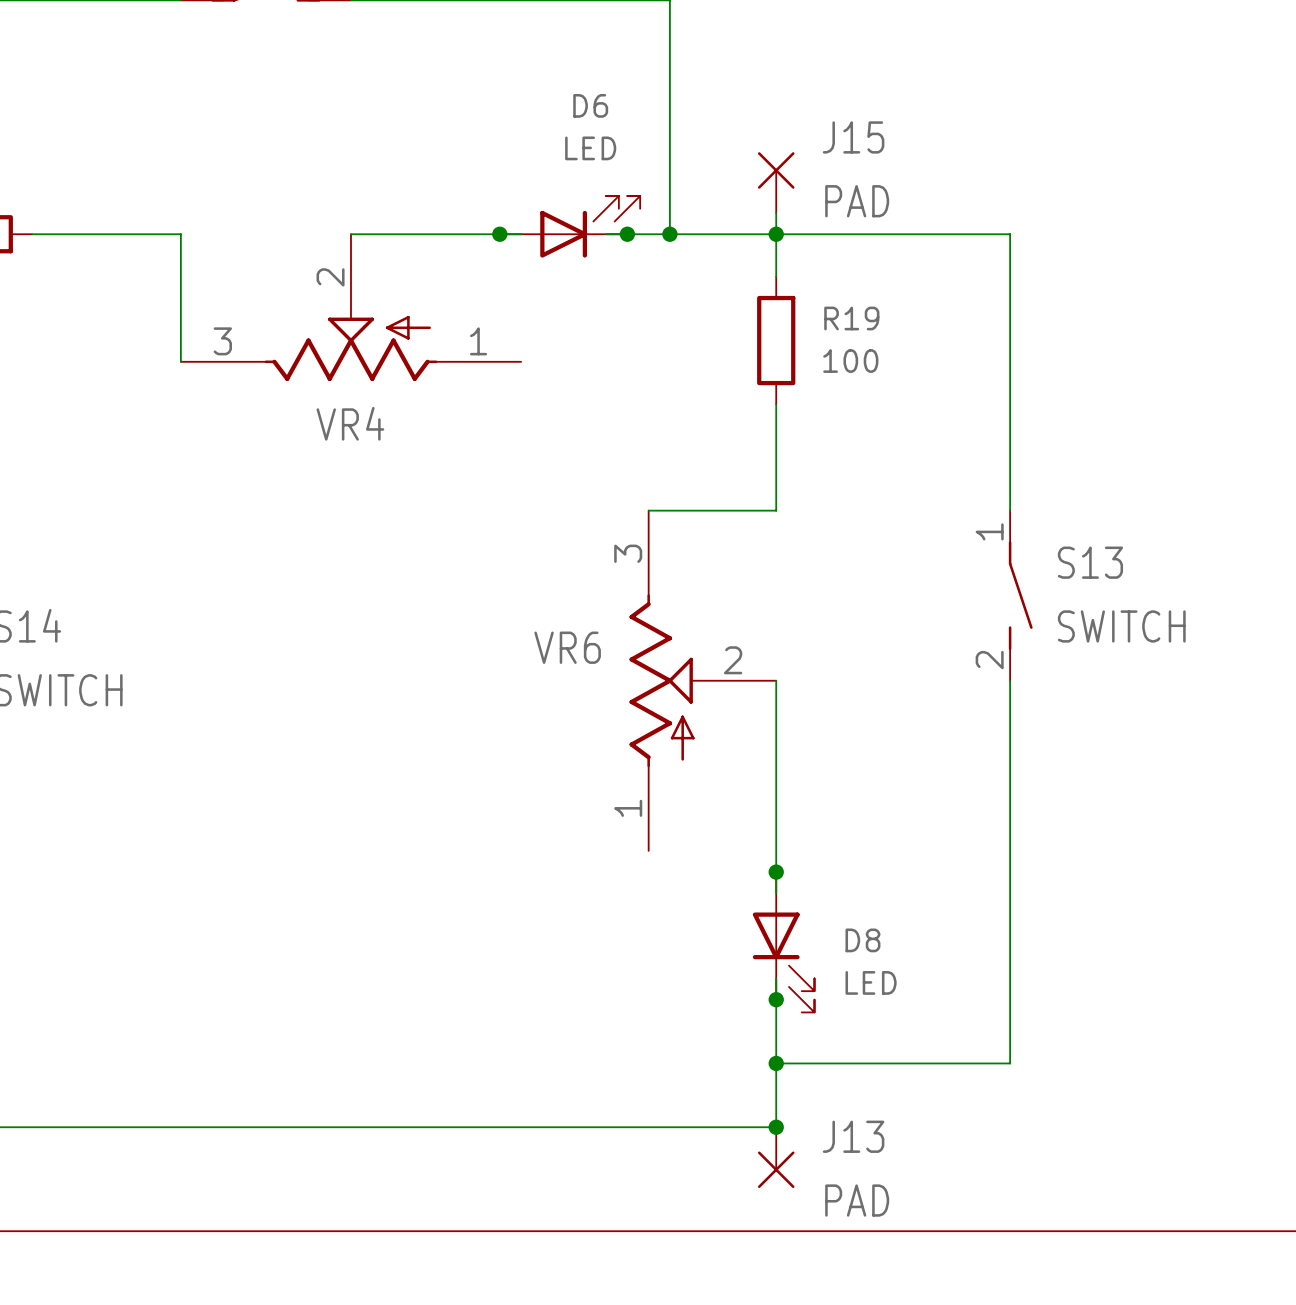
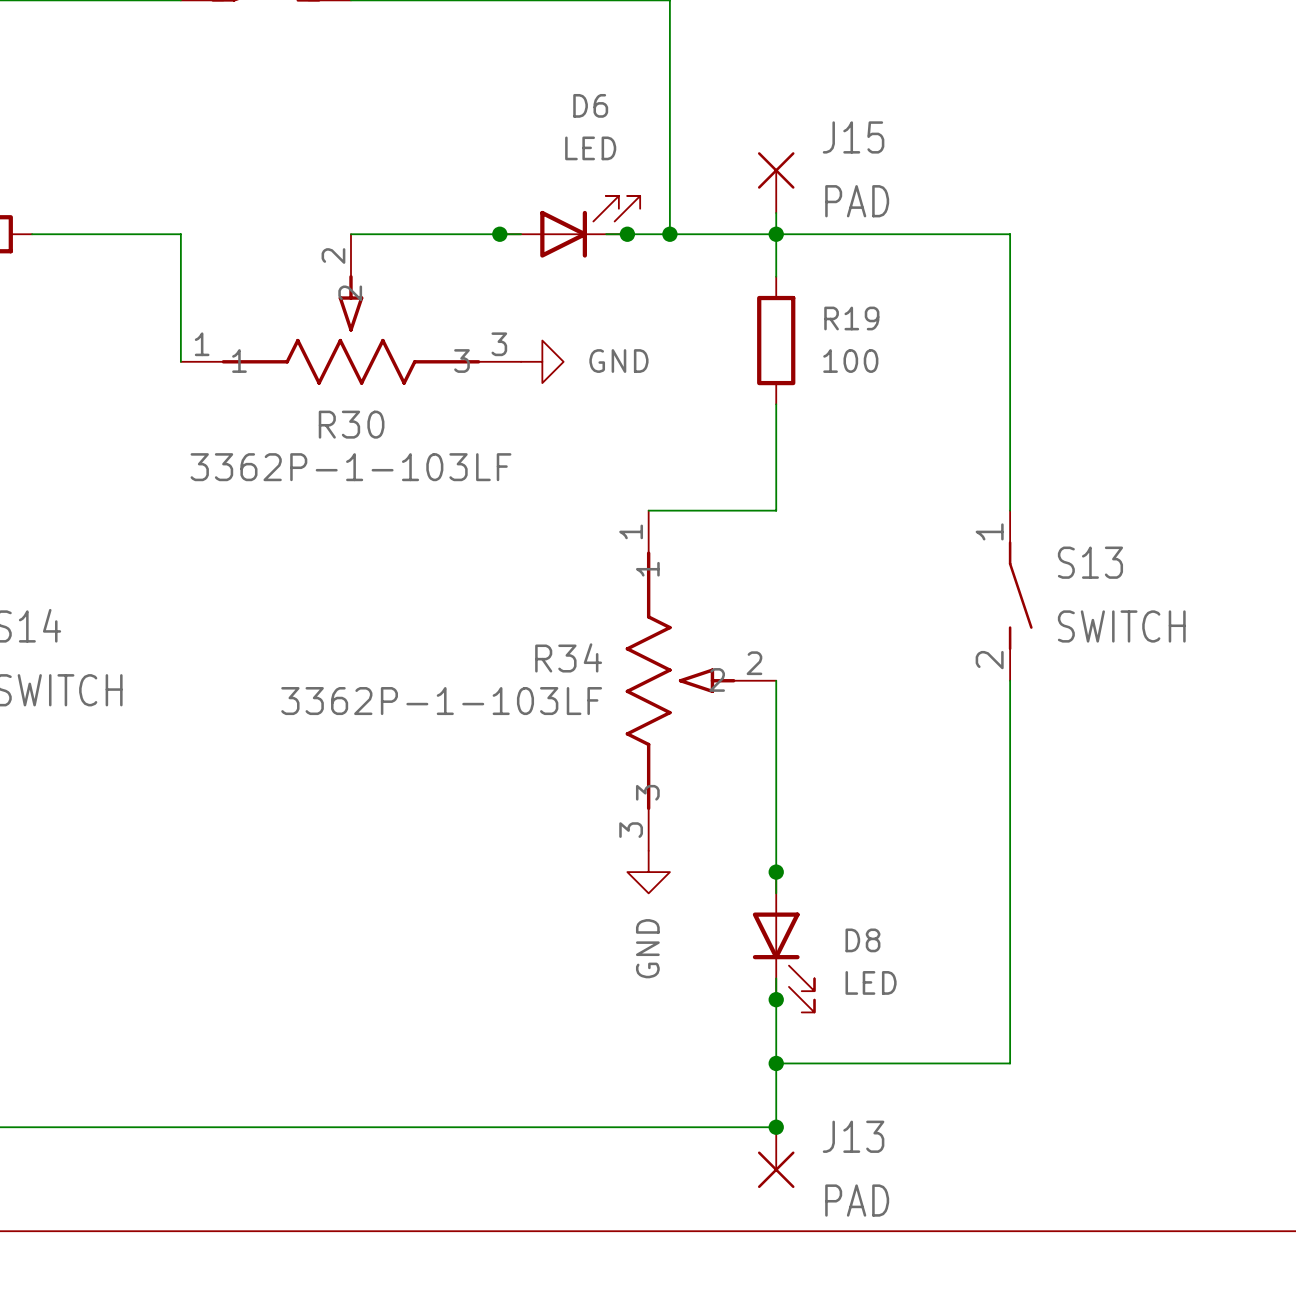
VR4: (350, 307) -> none
R30: none -> 3362P-1-103LF (350, 309)
power symbol: none -> GND (542, 361)
R34: none -> 3362P-1-103LF (700, 680)
VR6: (702, 680) -> none
power symbol: none -> GND (648, 872)

